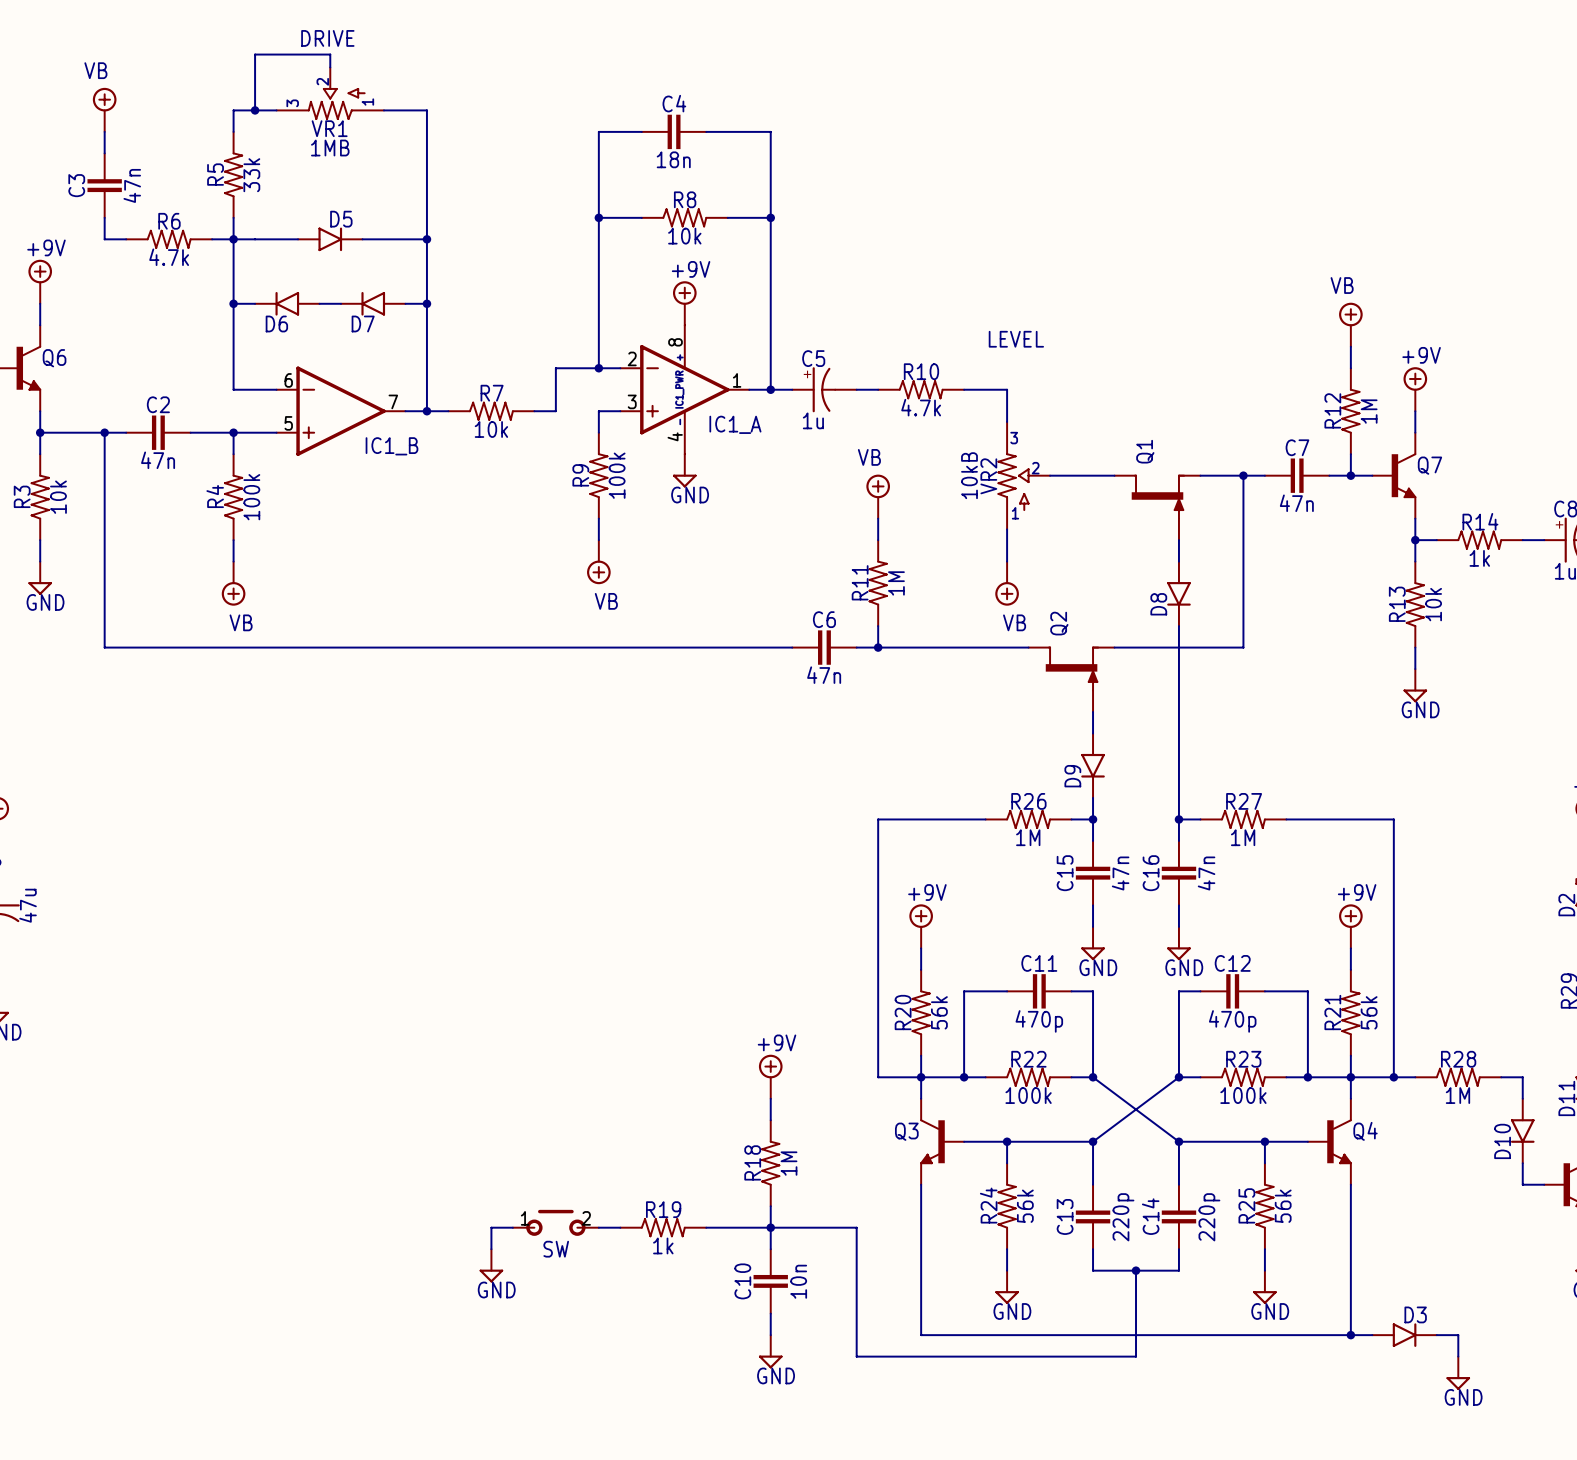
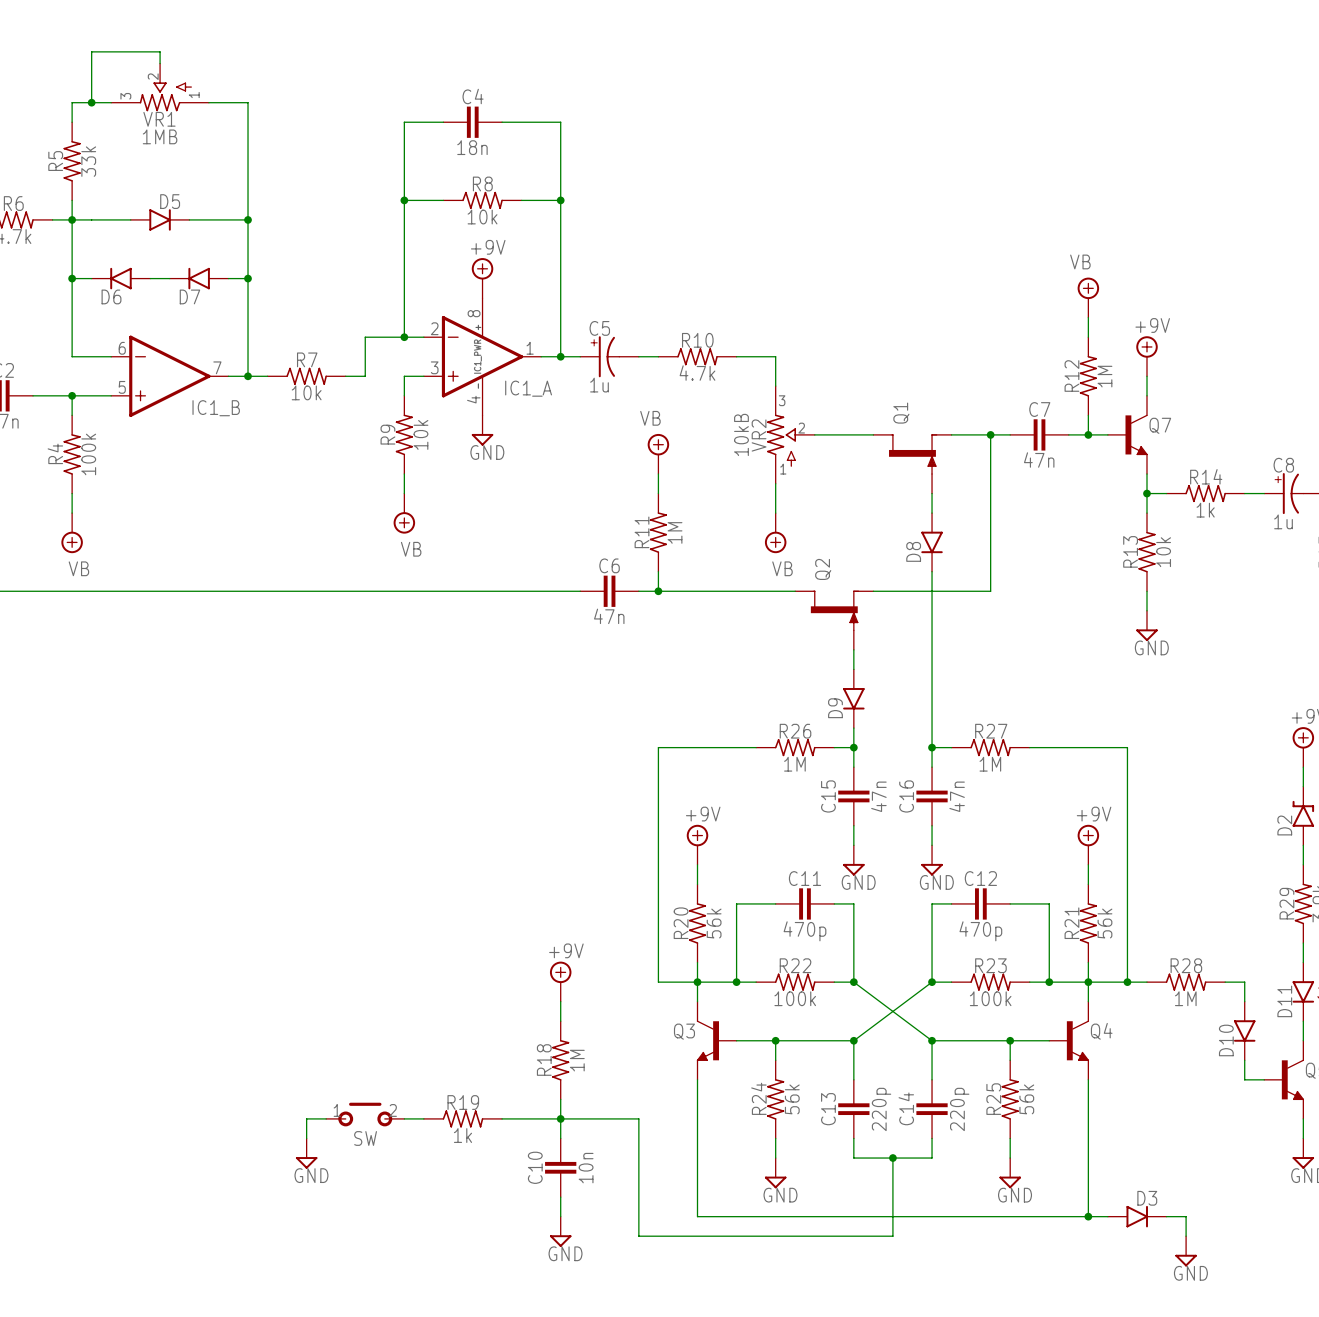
text: DRIVE (327, 38) -> none
text: LEVEL (1016, 339) -> none
R9 value: 100k (617, 475) -> 10k (420, 434)

